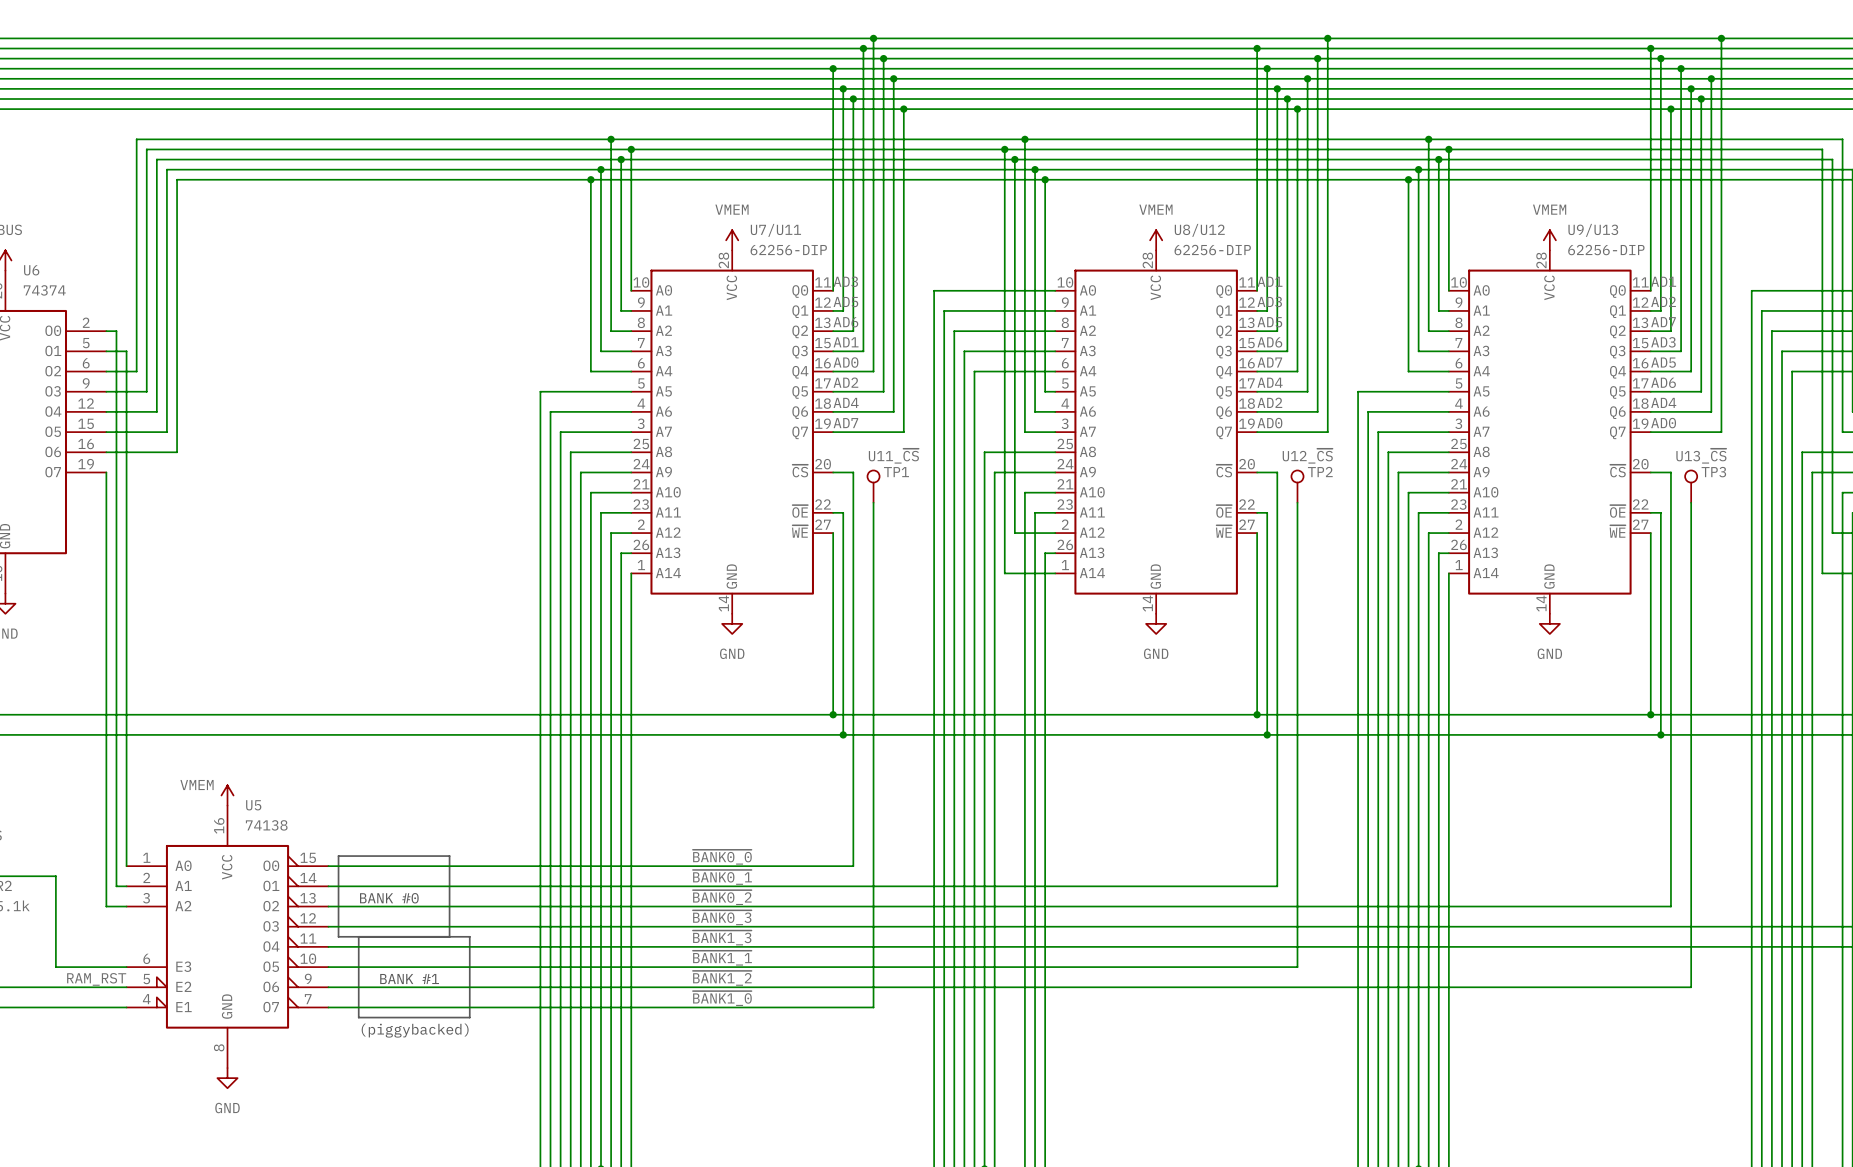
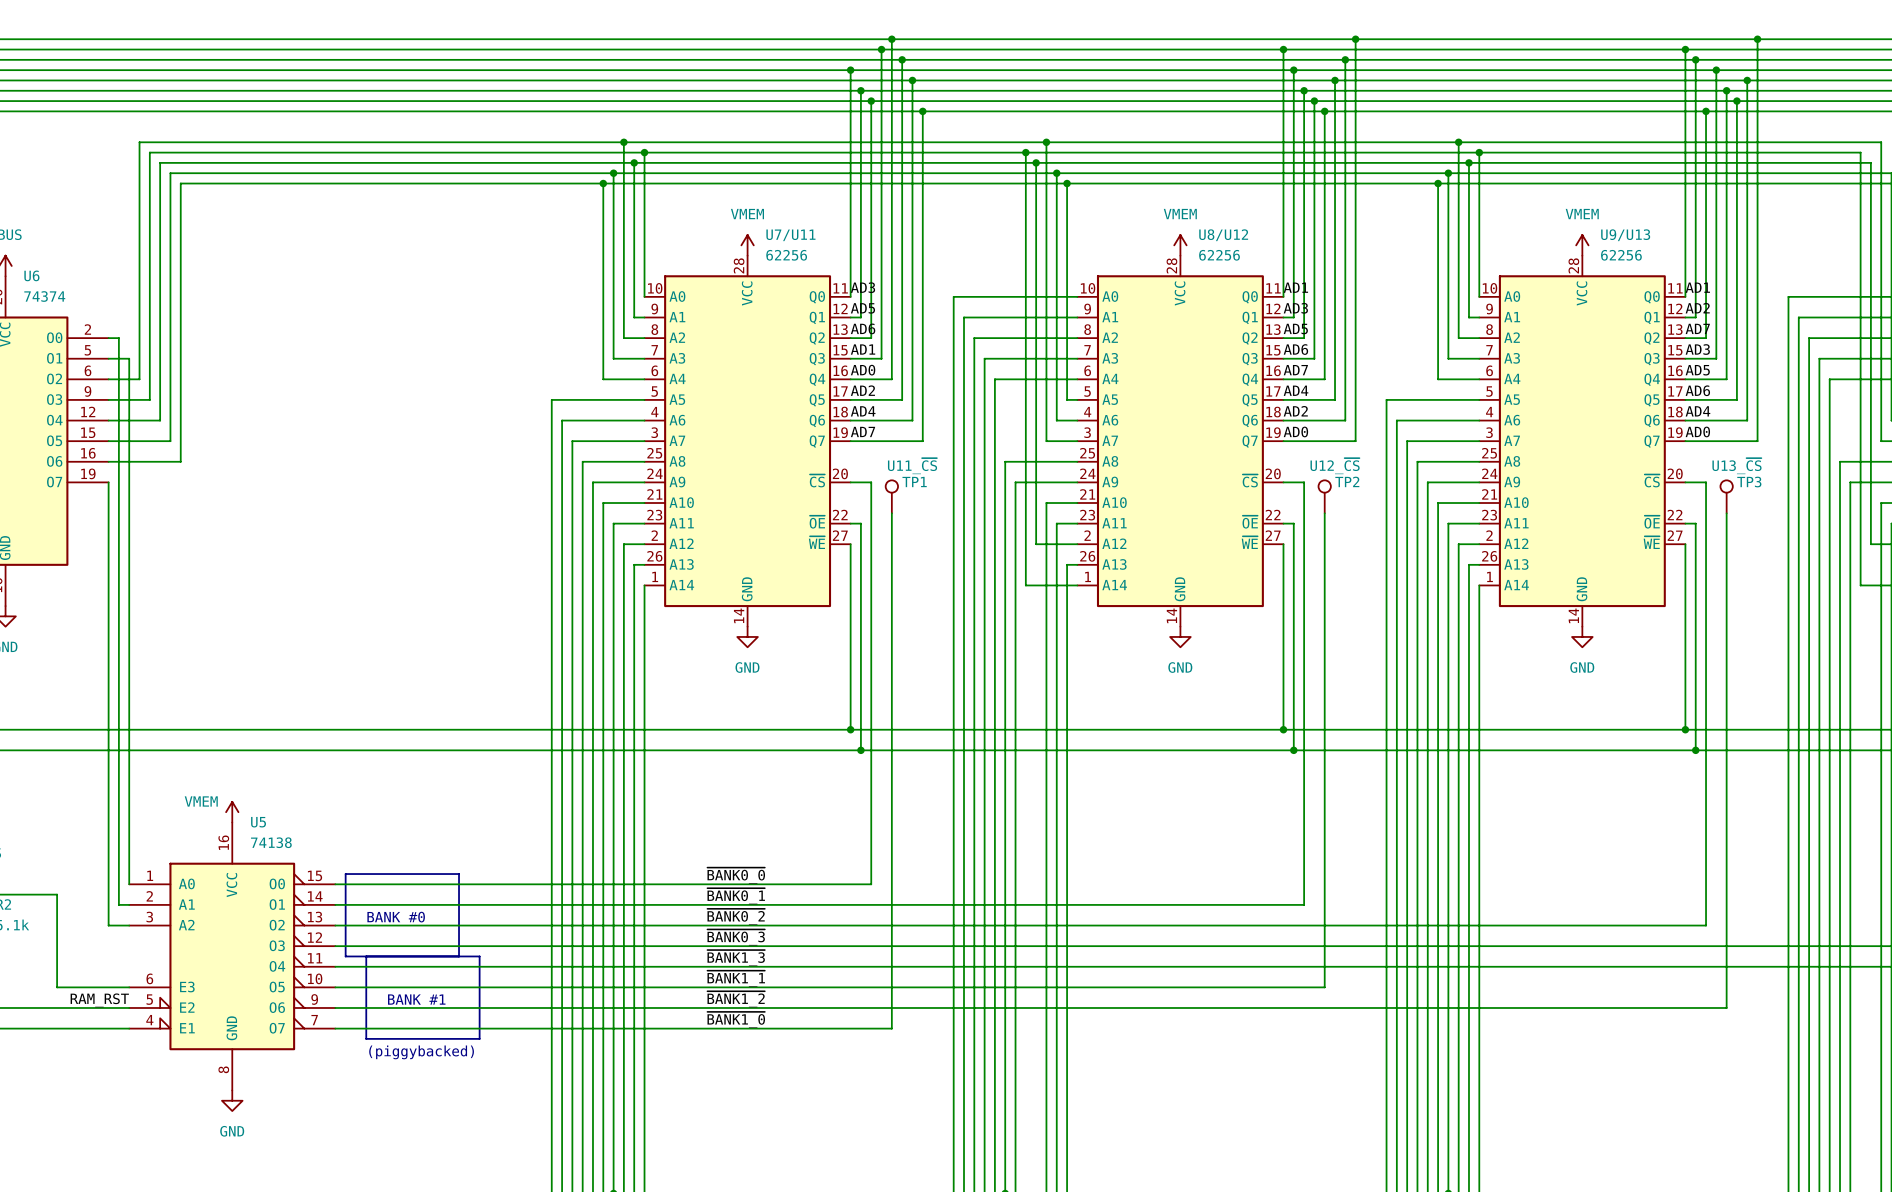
U7/U11 value: 62256-DIP (788, 250) -> 62256 (786, 255)
U8/U12 value: 62256-DIP (1212, 250) -> 62256 (1219, 255)
U9/U13 value: 62256-DIP (1606, 250) -> 62256 (1621, 255)

